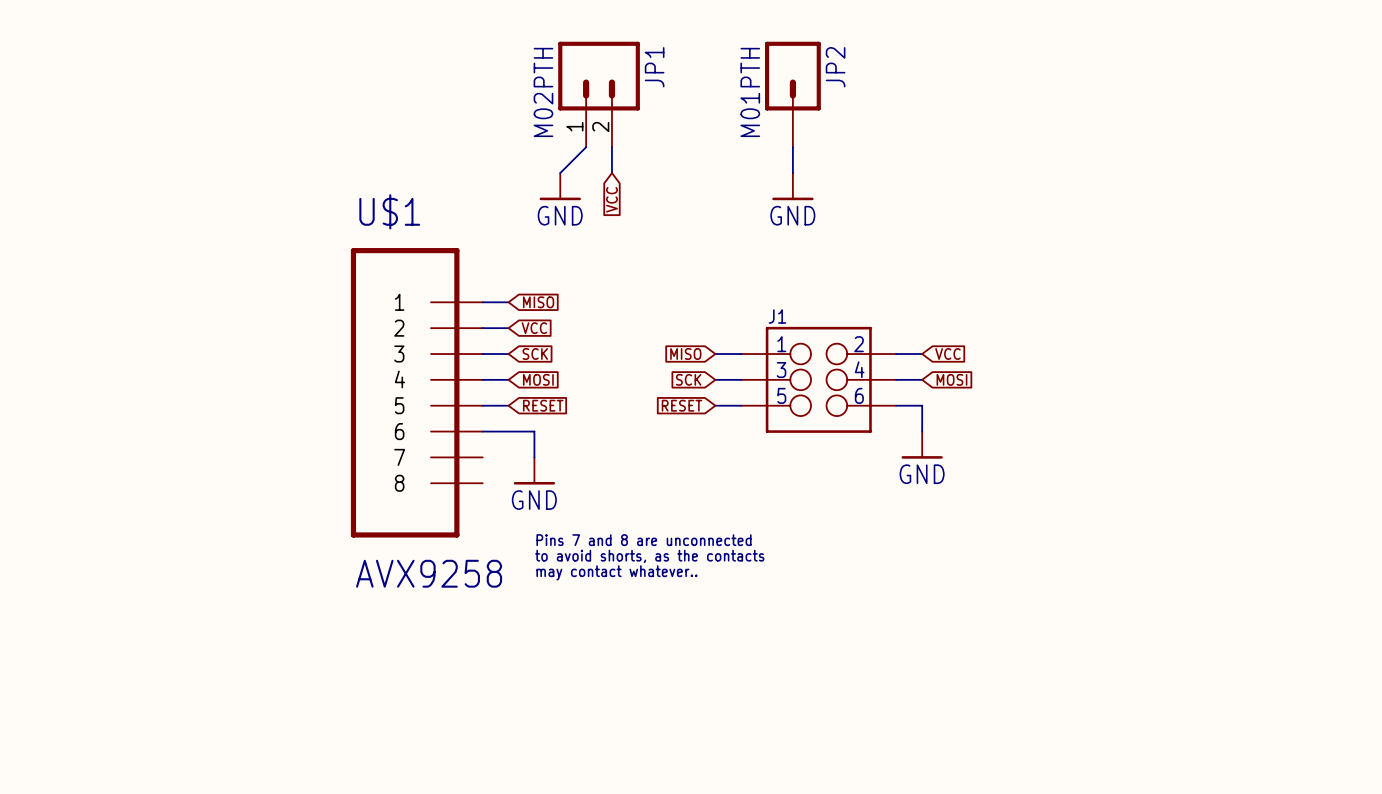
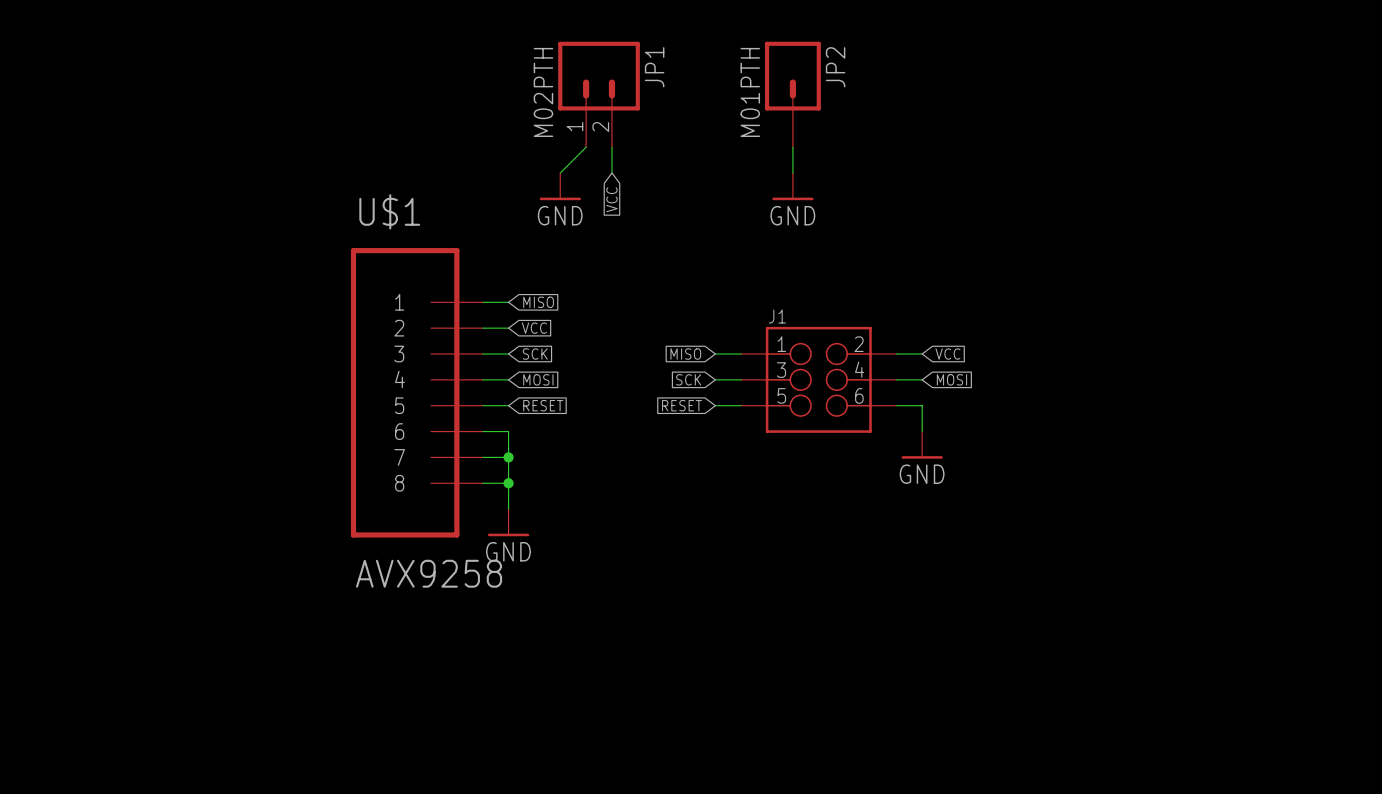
wire: (508, 431) (534, 431) (534, 457) -> (508, 431) (508, 509)
wire: none -> (482, 457) (508, 457)
junction: none -> (508, 457)
power symbol position: GND (534, 470) -> GND (508, 522)
wire: none -> (482, 483) (508, 483)
junction: none -> (508, 483)
text: Pins 7 and 8 are unconnected (643, 540) -> none
text: to avoid shorts, as the contacts (649, 556) -> none
text: may contact whatever.. (616, 572) -> none

